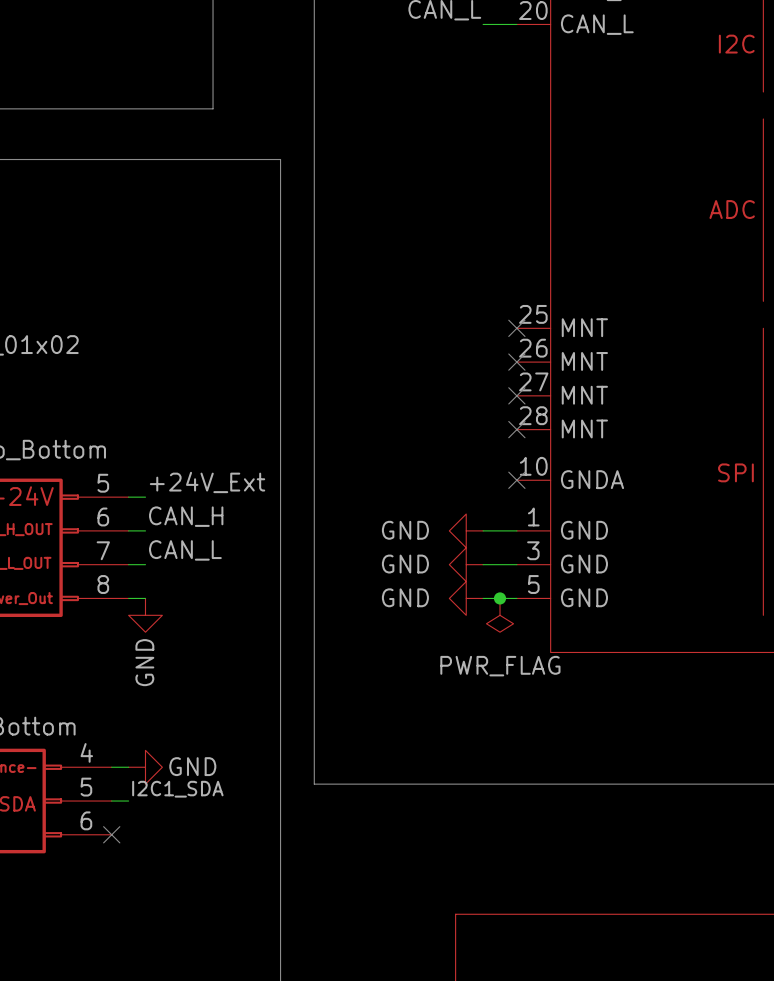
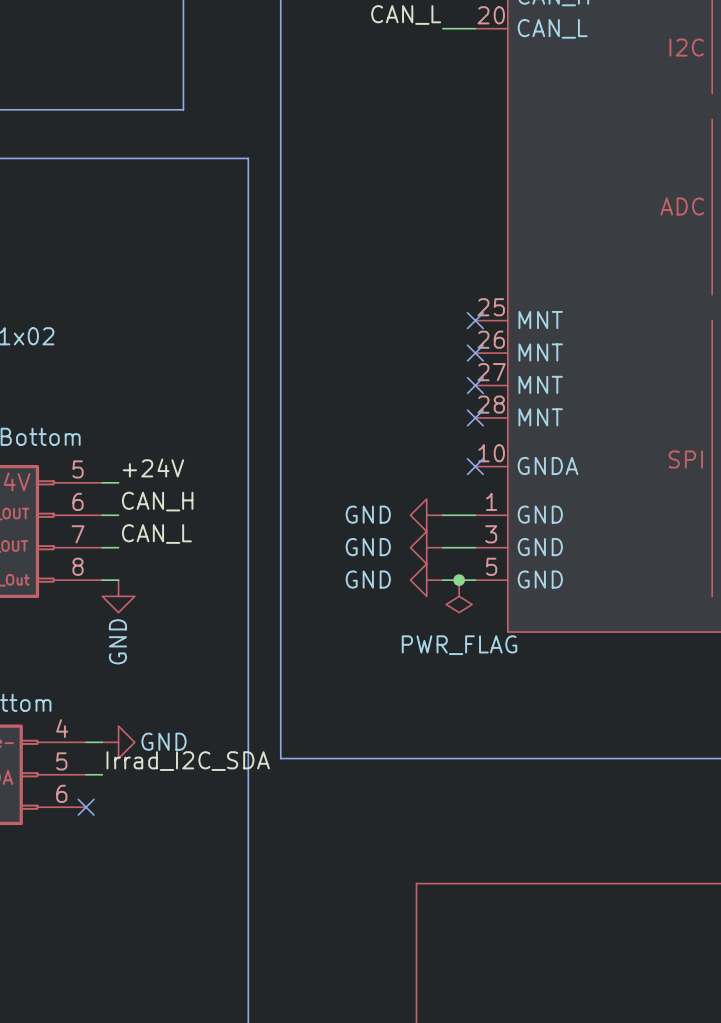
label: +24V_Ext (207, 482) -> +24V (153, 467)
label: I2C1_SDA (177, 789) -> Irrad_I2C_SDA (188, 761)

